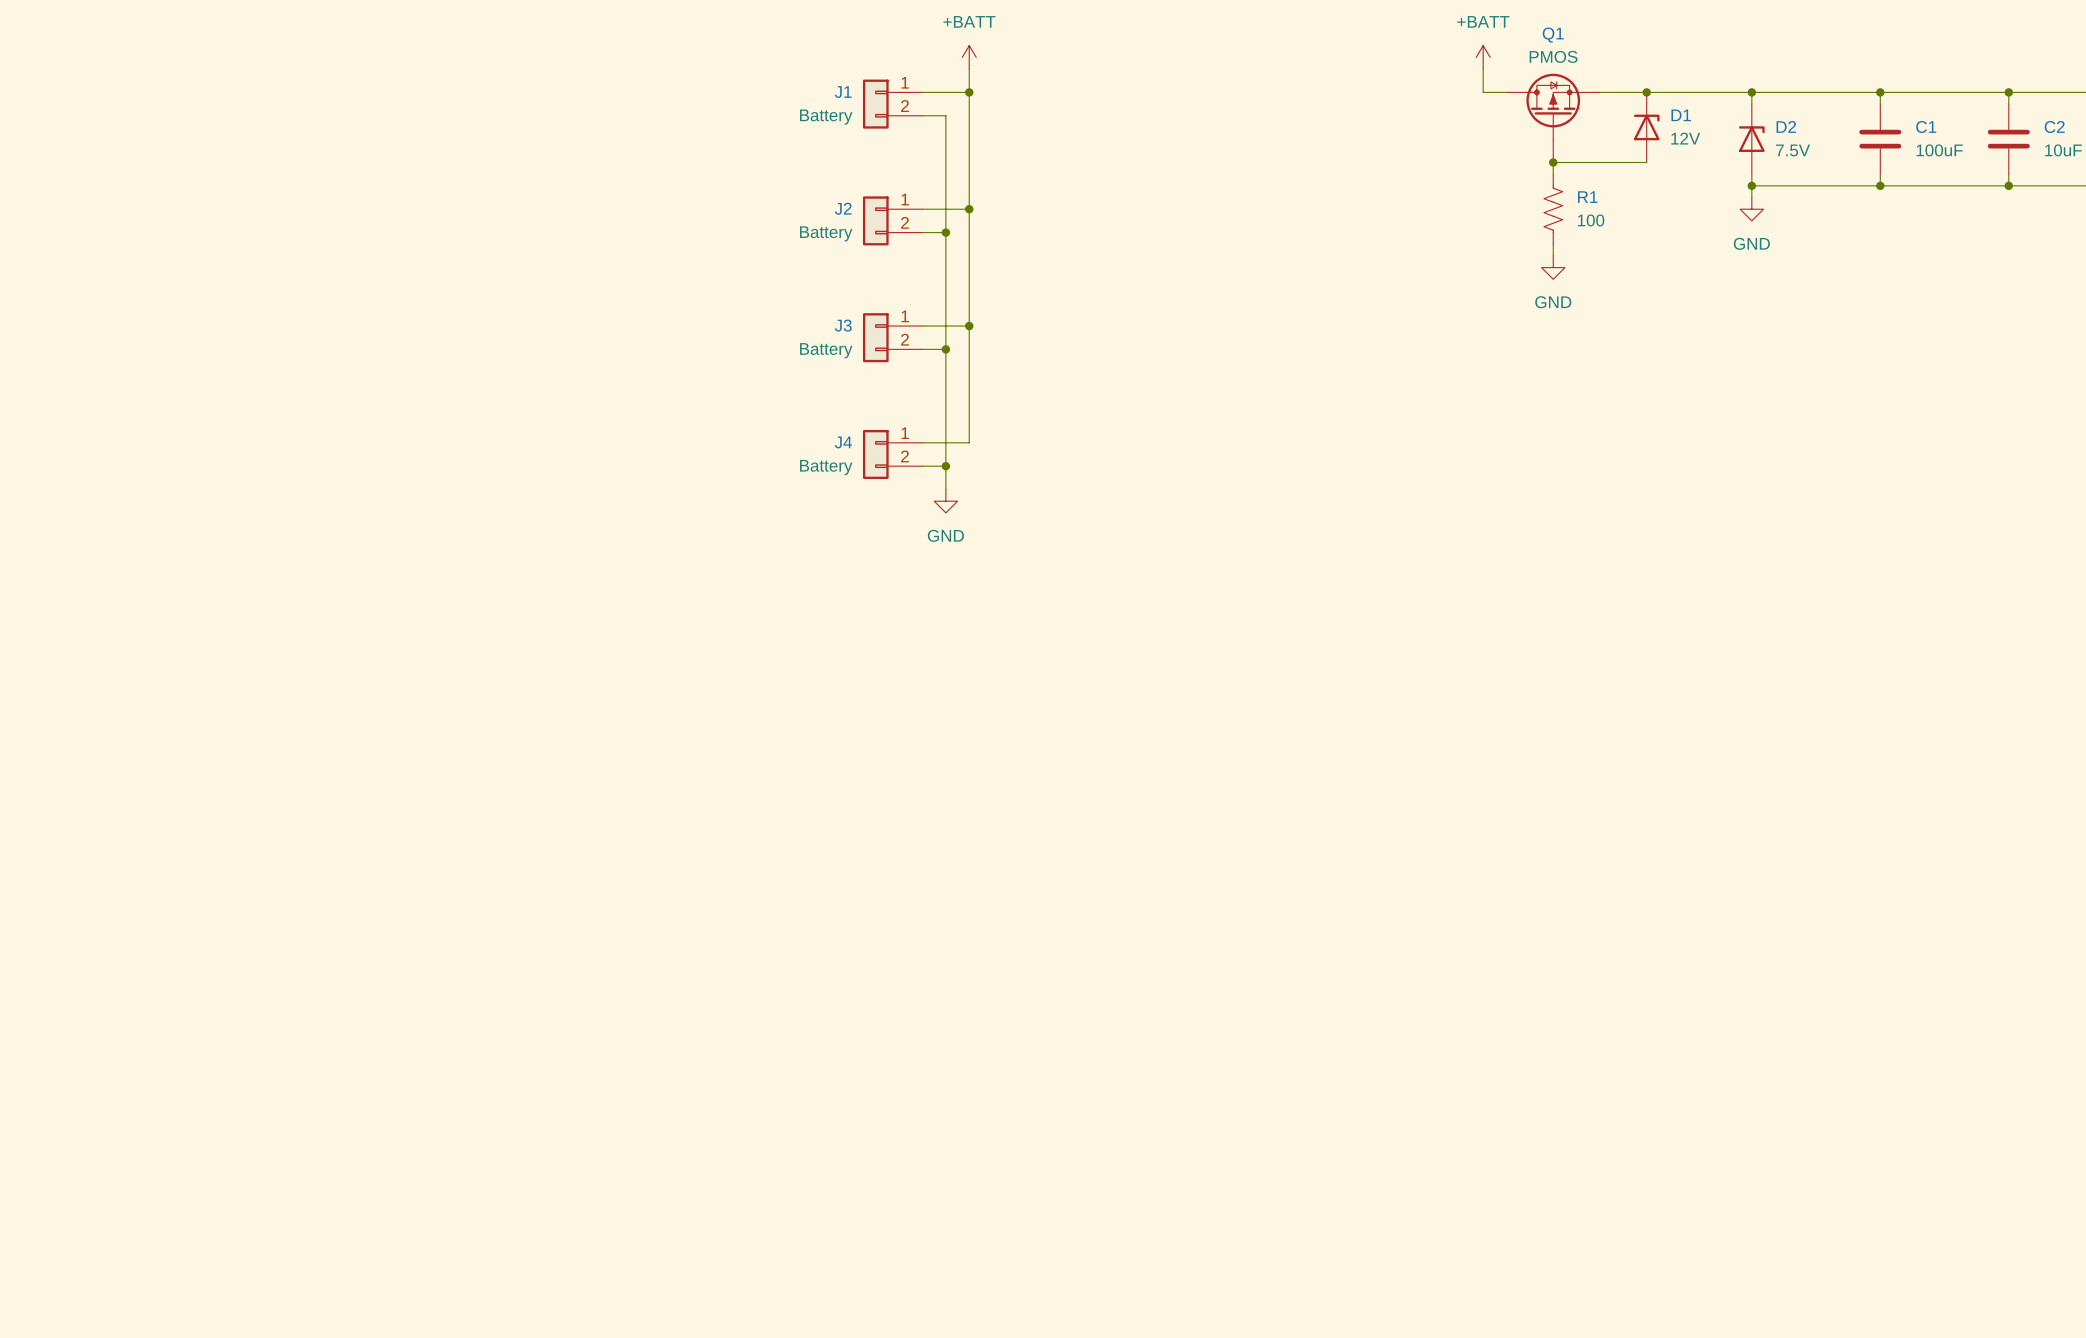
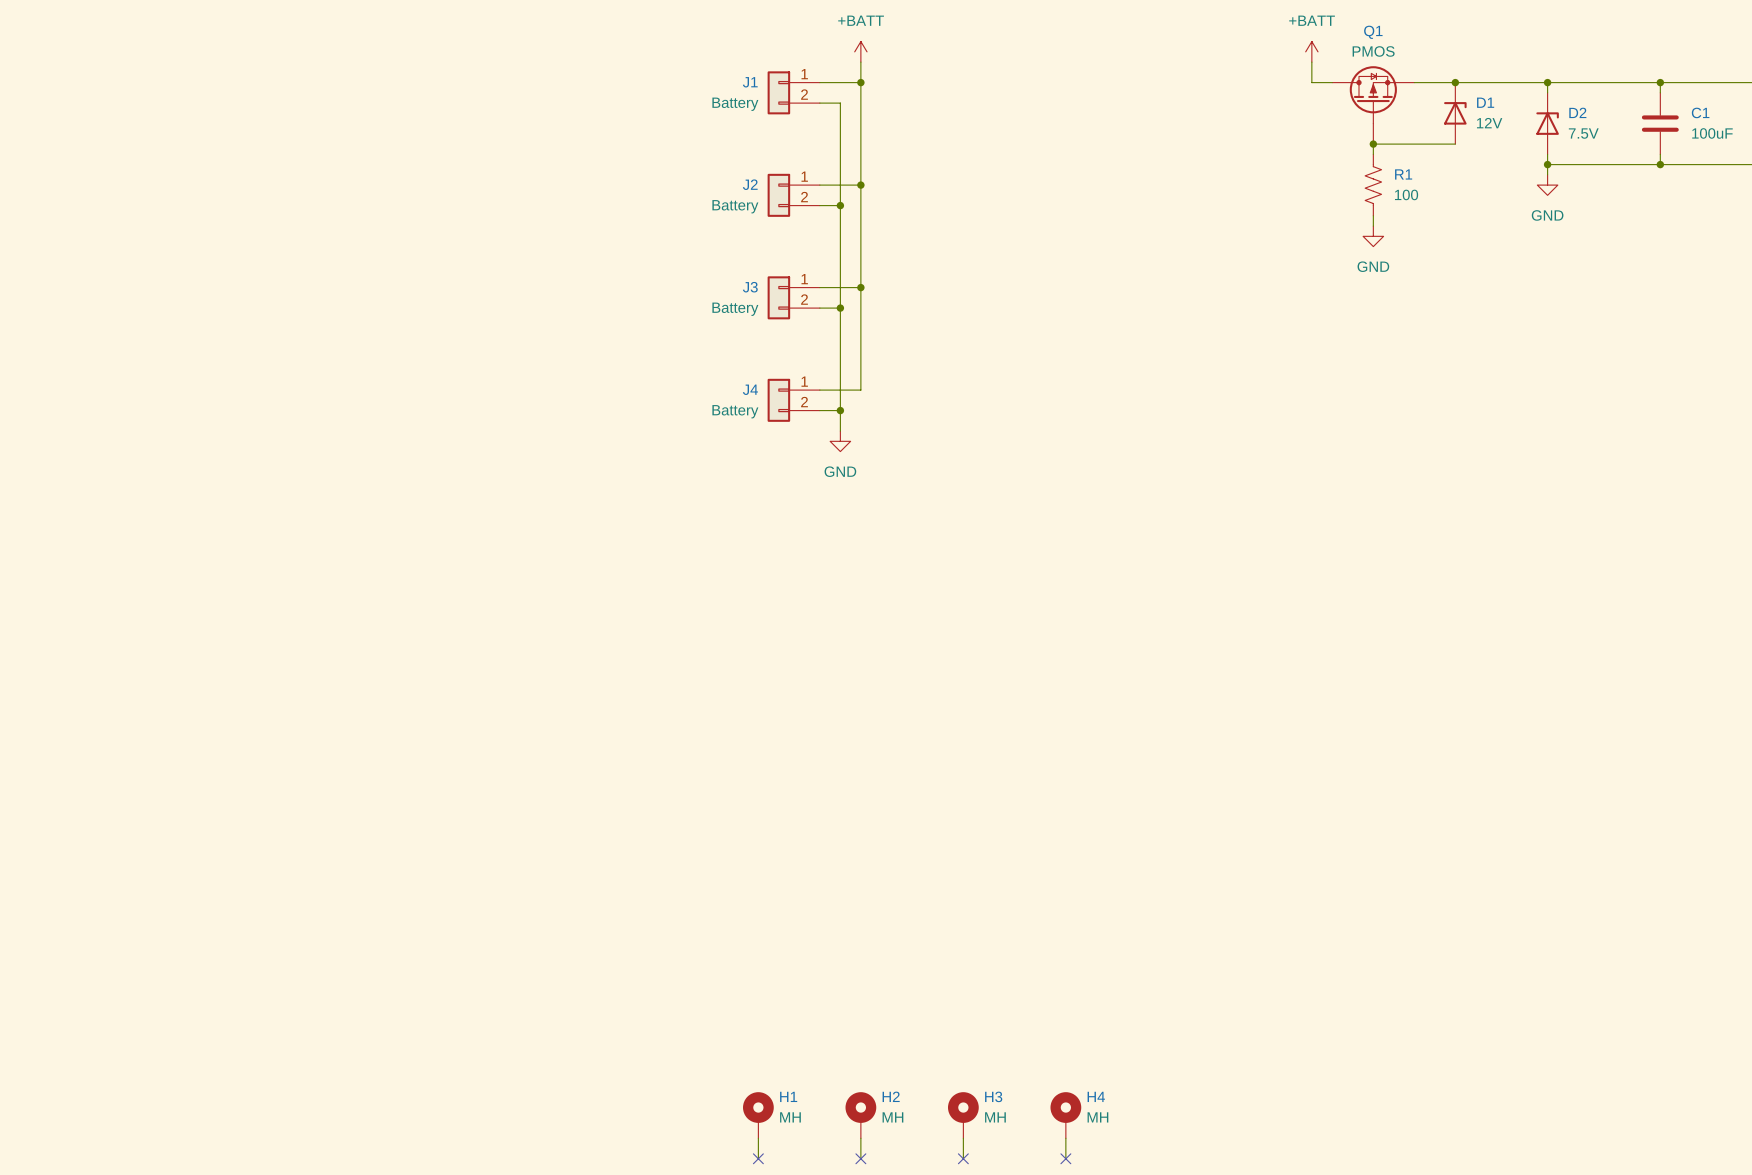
H1: none -> MH (758, 1115)
H2: none -> MH (860, 1115)
H3: none -> MH (963, 1115)
H4: none -> MH (1065, 1115)
wire: none -> (758, 1138) (758, 1158)
wire: none -> (860, 1138) (860, 1158)
wire: none -> (963, 1138) (963, 1158)
wire: none -> (1065, 1138) (1065, 1158)
no-connect mark: none -> (758, 1158)
no-connect mark: none -> (860, 1158)
no-connect mark: none -> (963, 1158)
no-connect mark: none -> (1065, 1158)

